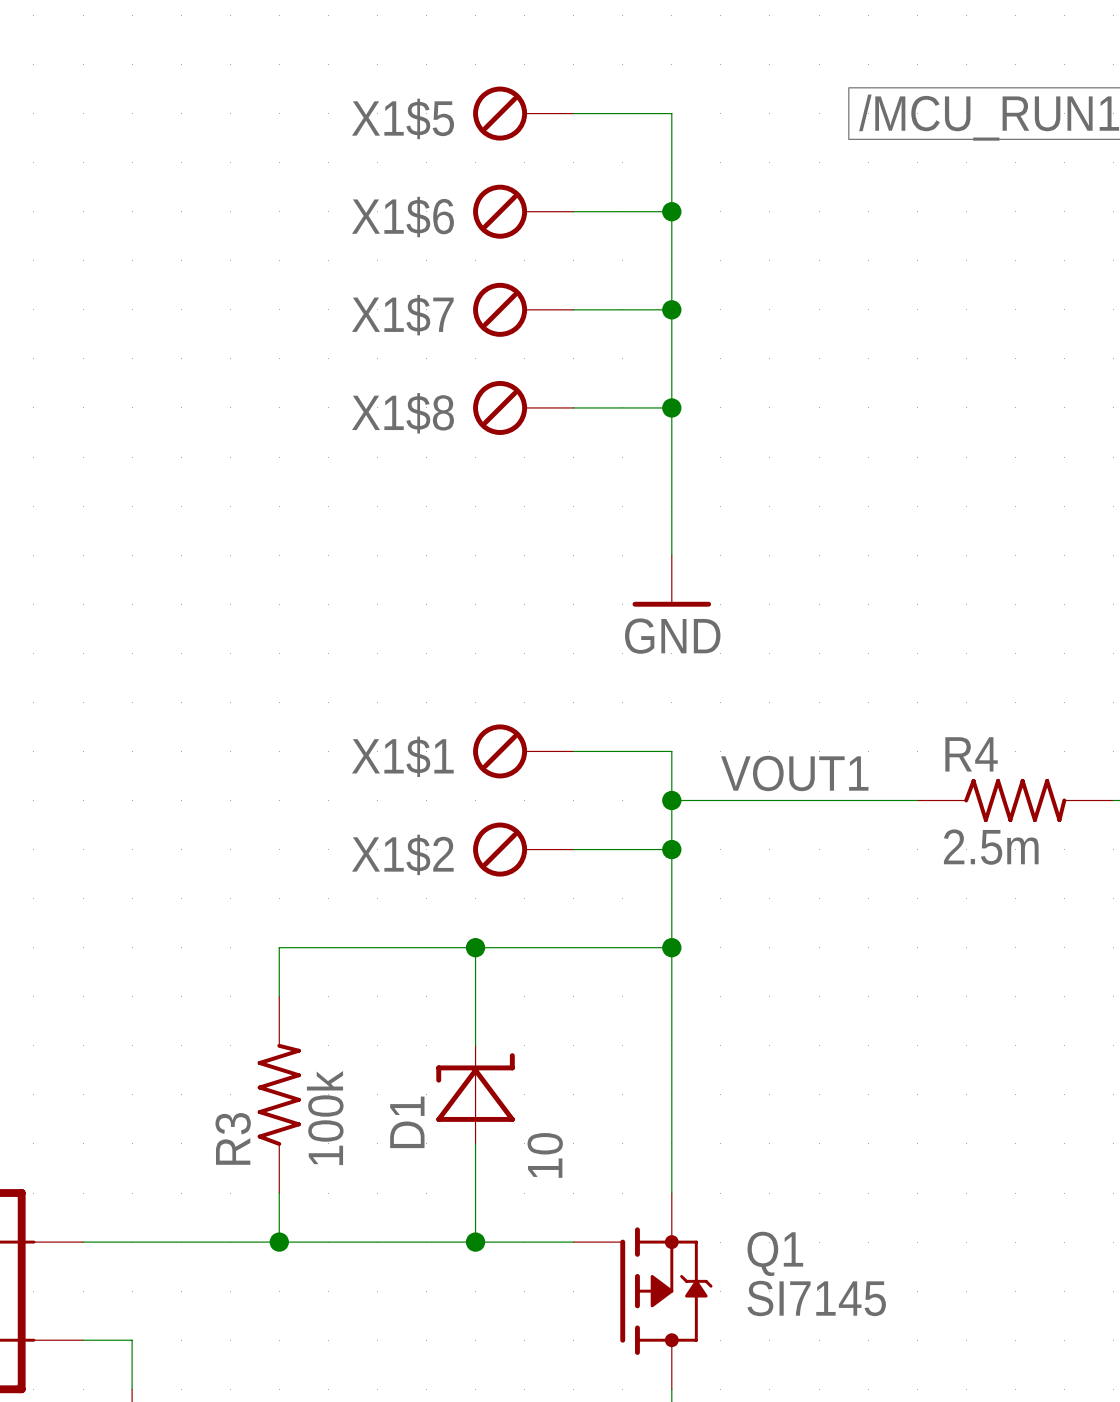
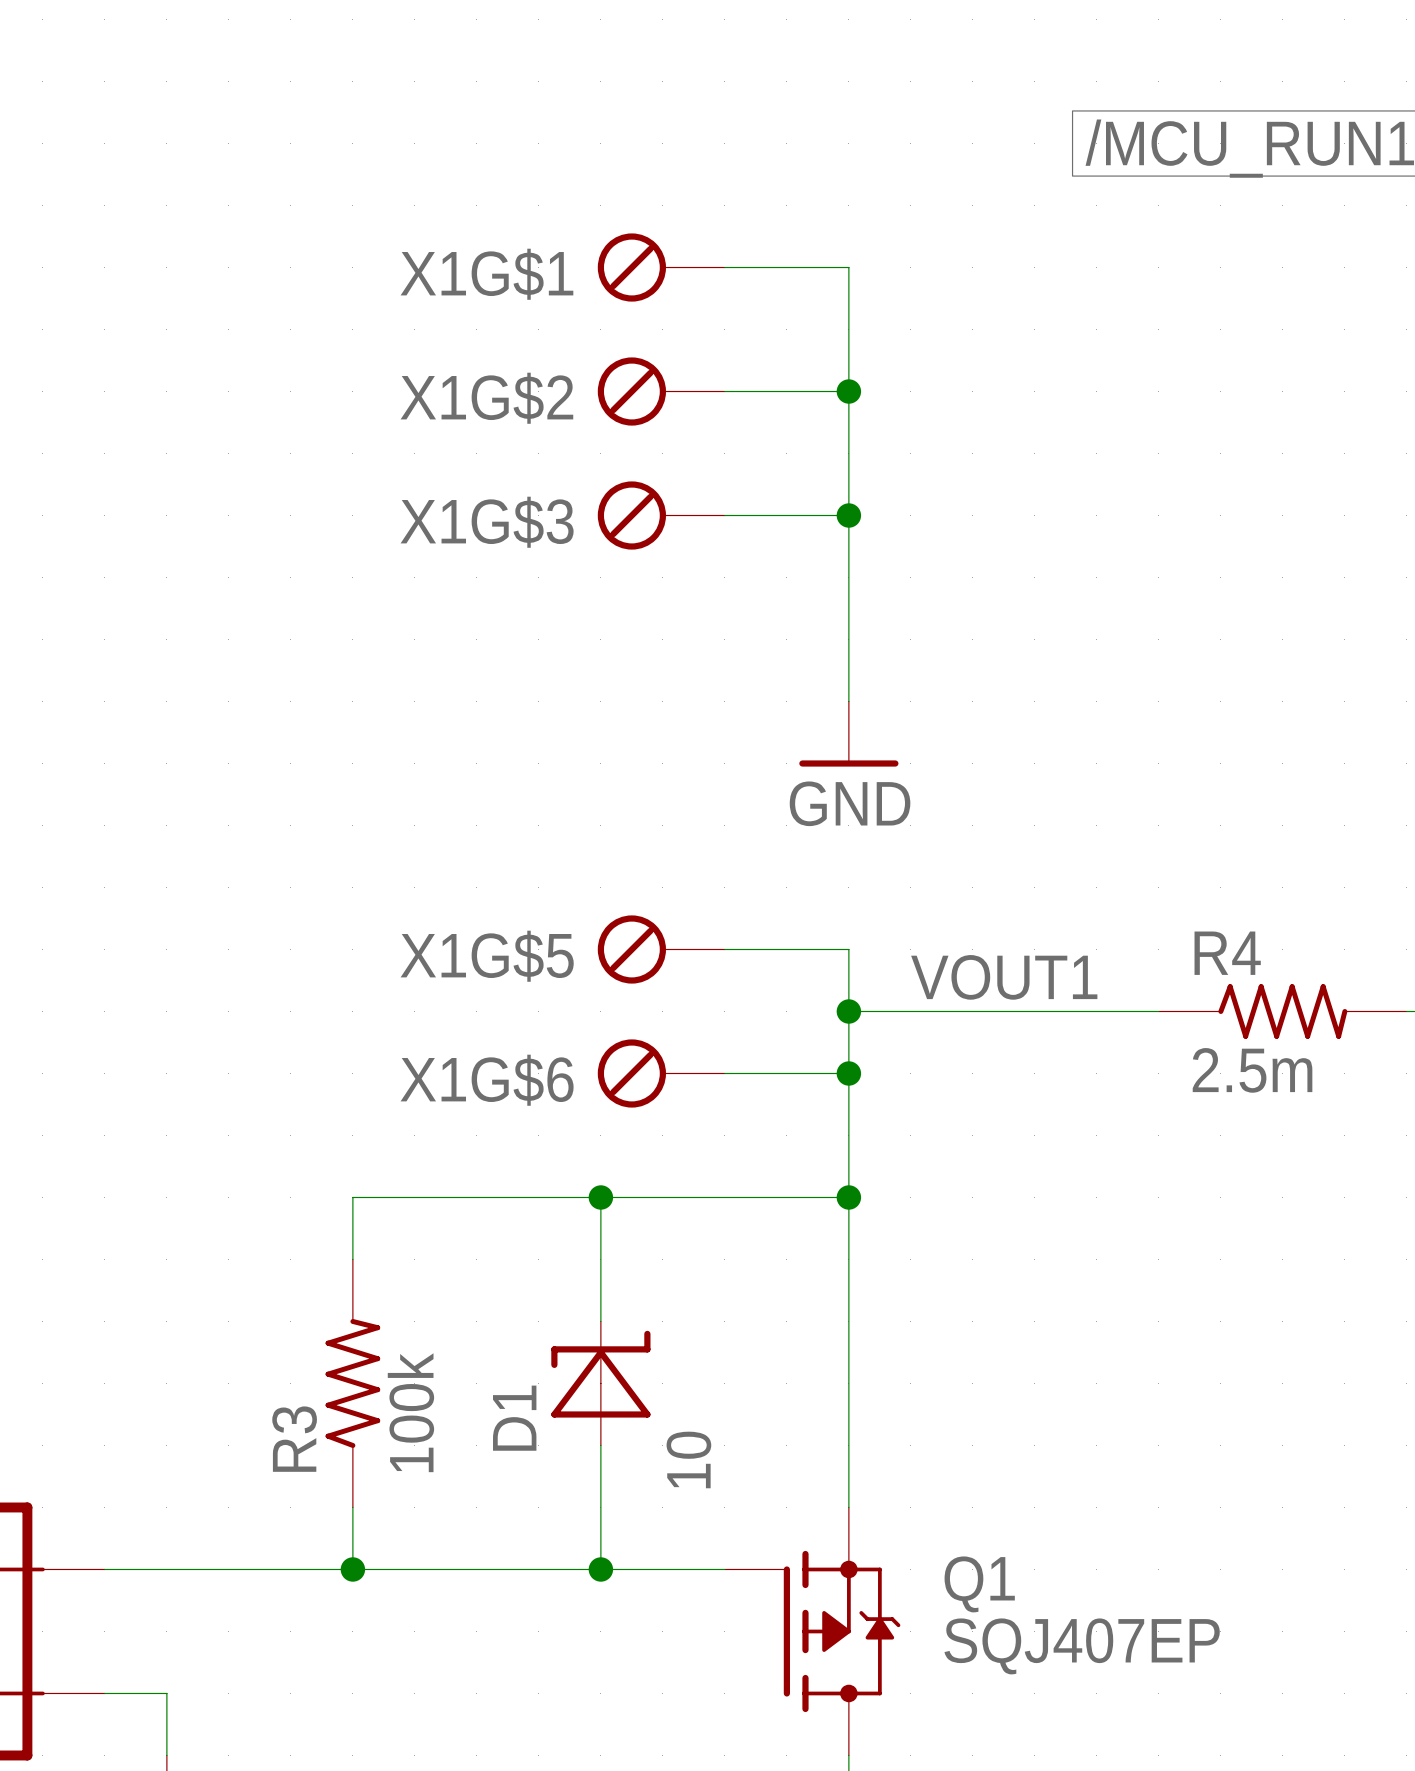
X1$5: (523, 113) -> none
wire: (573, 113) (671, 113) (671, 211) -> none
junction: (671, 211) -> none
X1$6 name: X1$6 (402, 217) -> X1G$1 (486, 274)
X1$7 name: X1$7 (402, 315) -> X1G$2 (486, 398)
X1$8 name: X1$8 (402, 413) -> X1G$3 (487, 522)
X1$1 name: X1$1 (402, 756) -> X1G$5 (487, 956)
X1$2 name: X1$2 (402, 854) -> X1G$6 (487, 1080)
Q1 value: SI7145 (816, 1298) -> SQJ407EP (1082, 1646)

